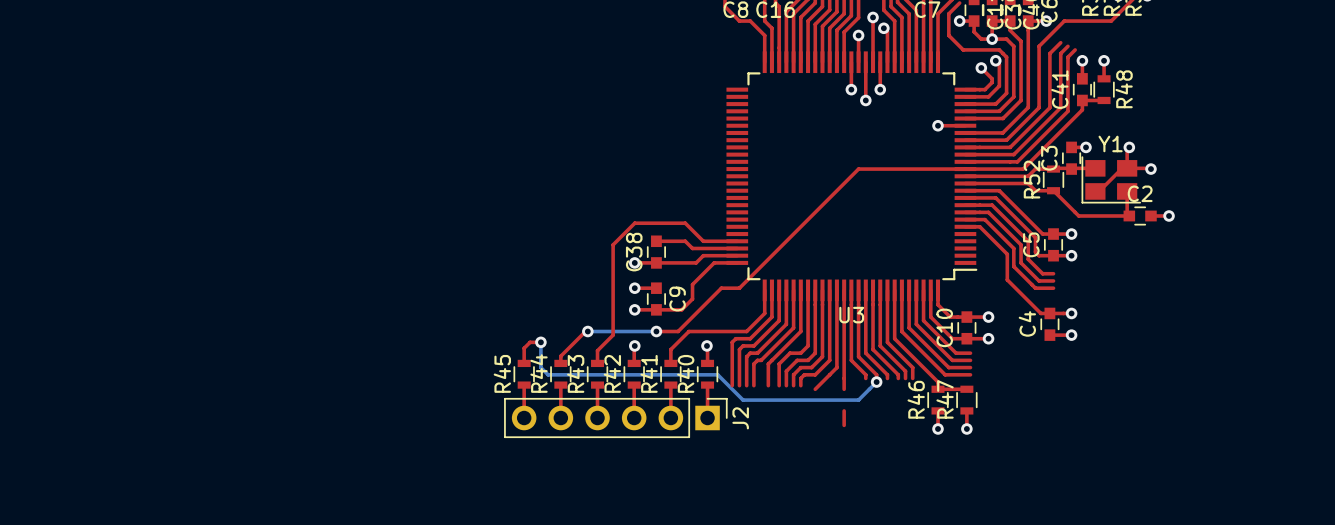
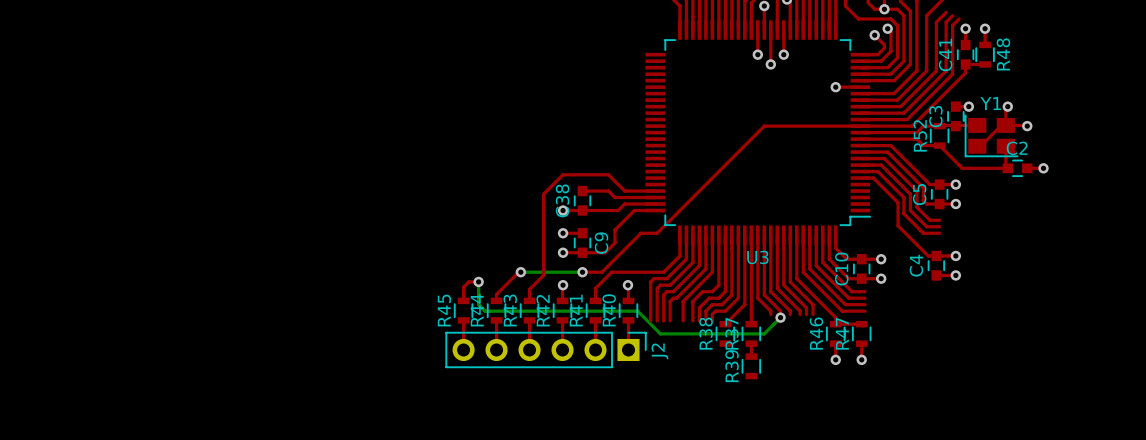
R38: none -> (725, 333)
R37: none -> (751, 333)
R39: none -> (751, 366)

